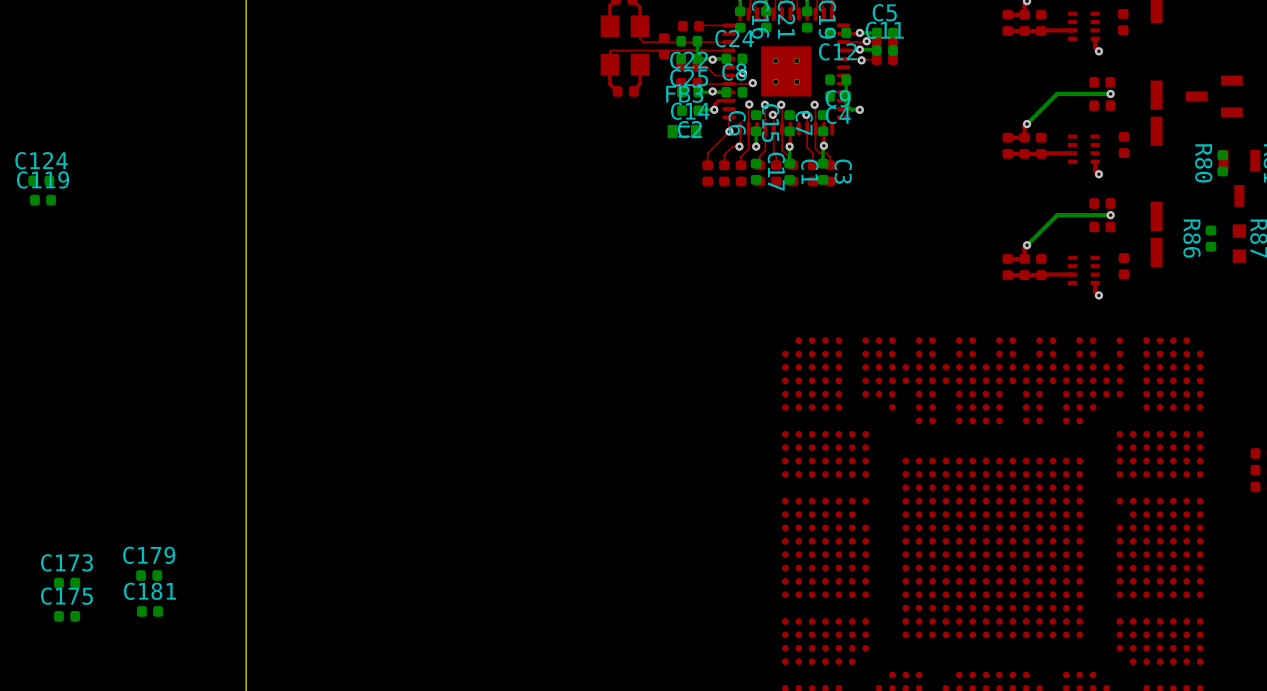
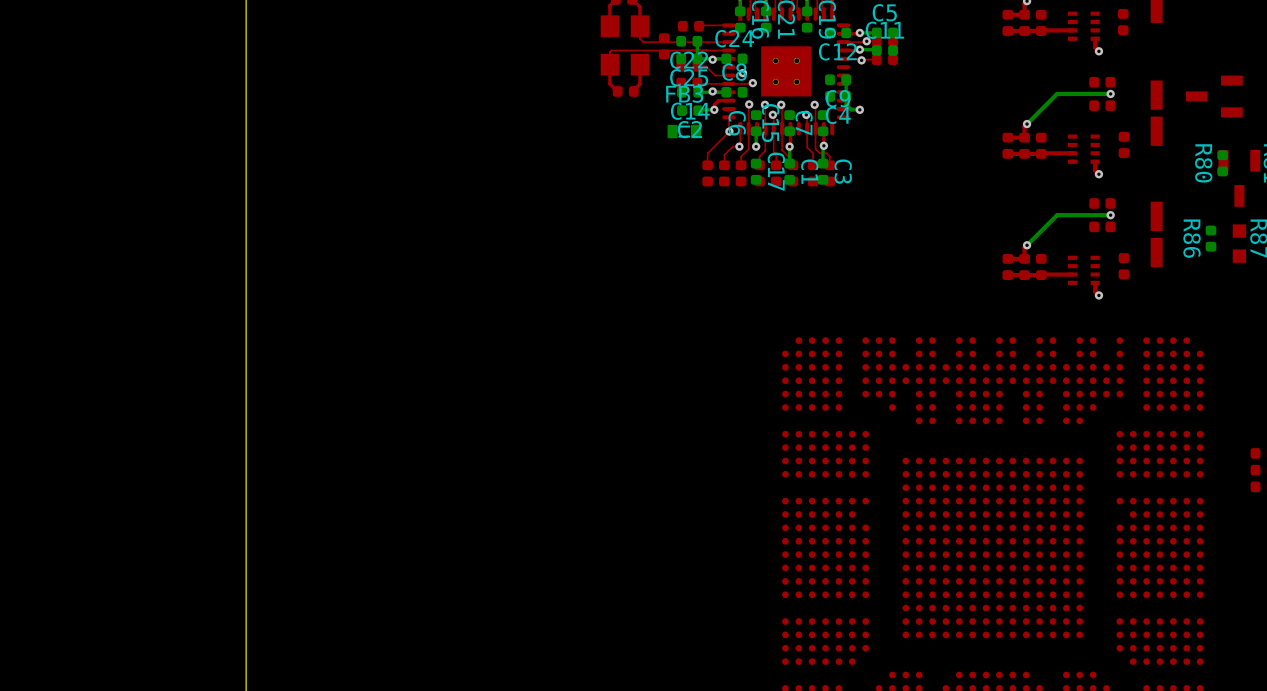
C124: (41, 180) -> none
C119: (43, 200) -> none
C179: (149, 575) -> none
C173: (67, 583) -> none
C181: (150, 611) -> none
C175: (67, 616) -> none

